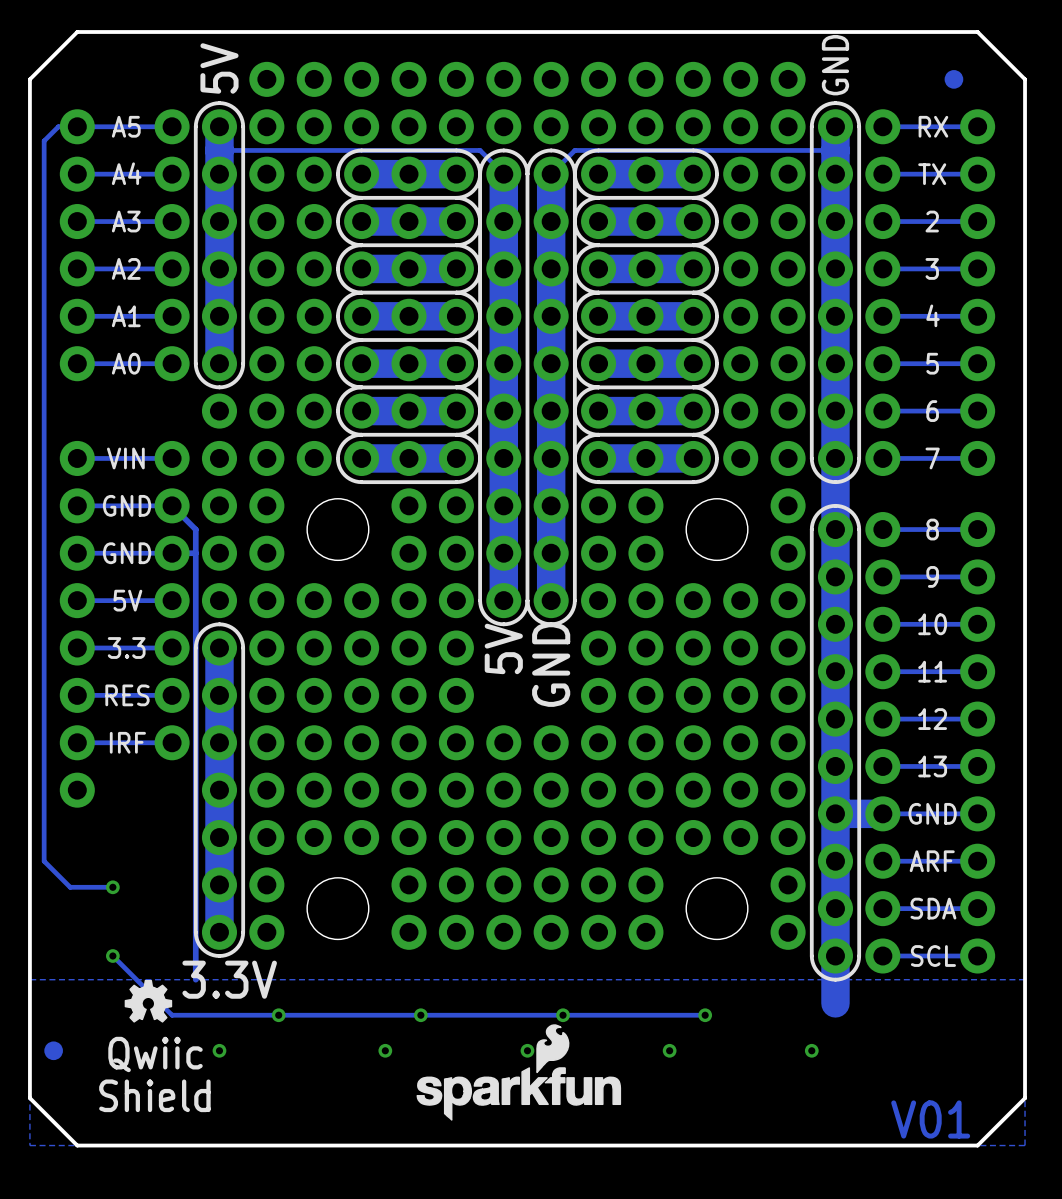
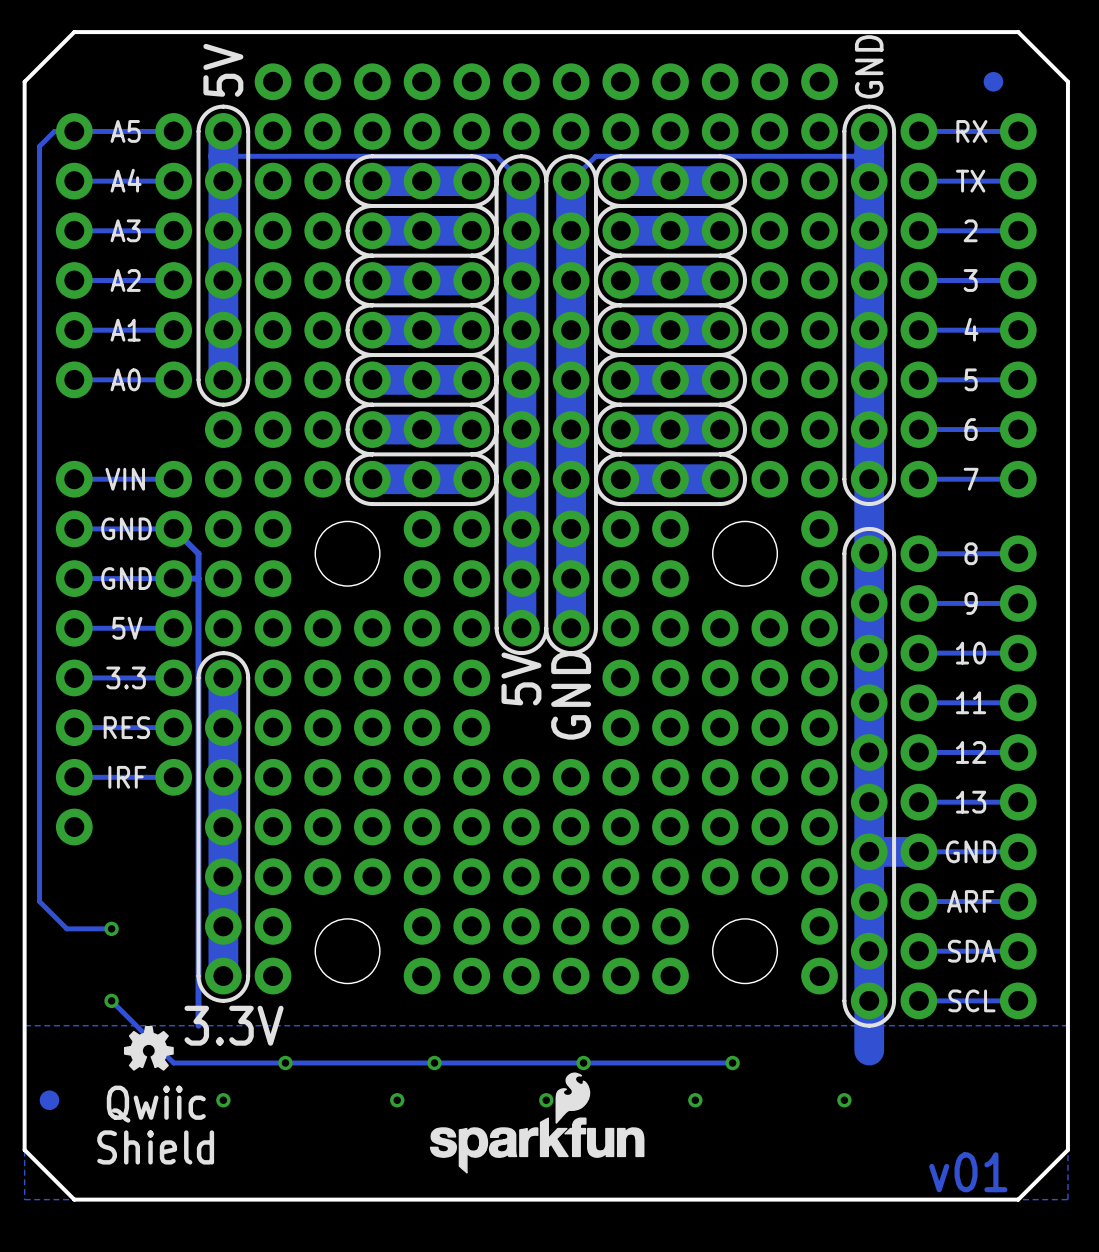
text: V01 (930, 1119) -> v01 (968, 1172)

